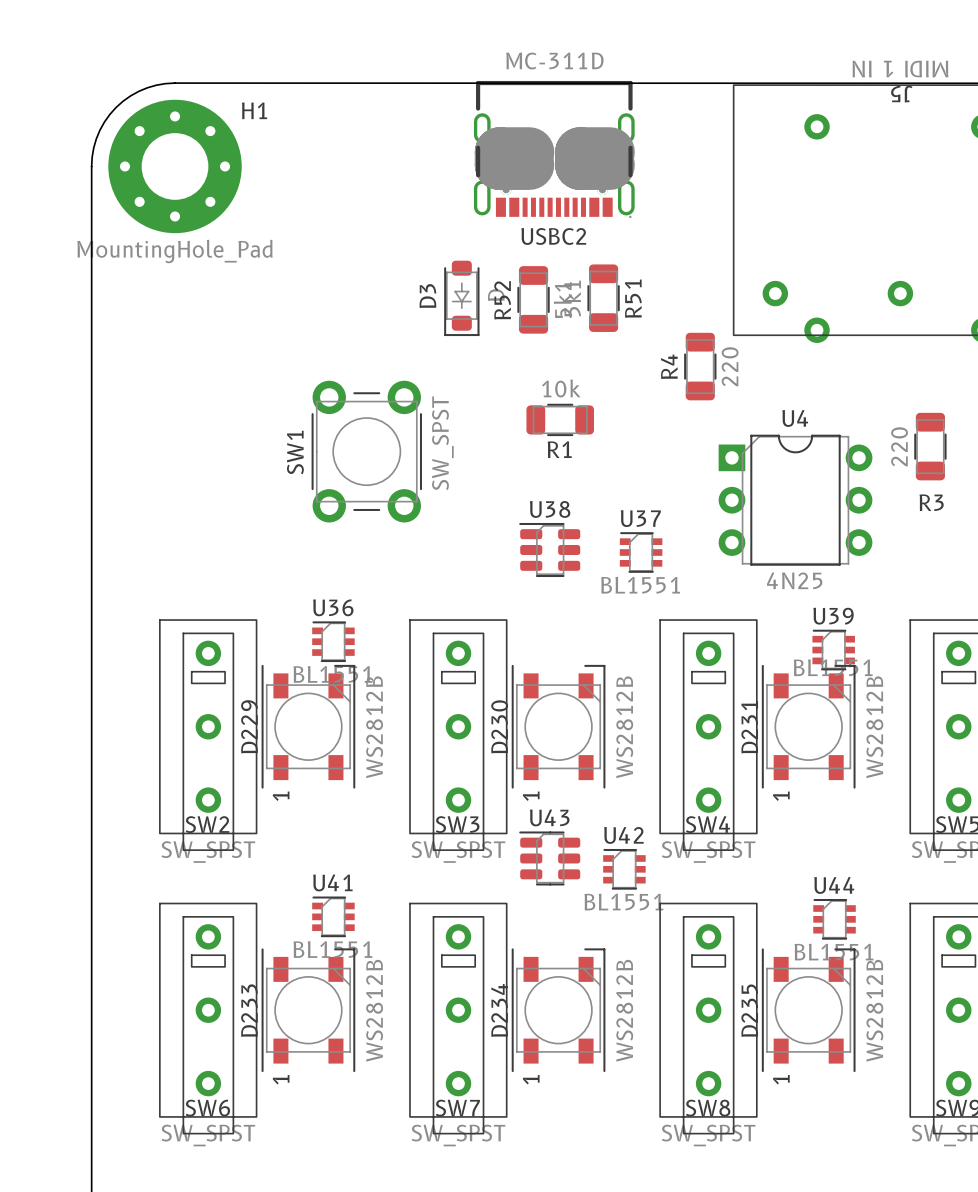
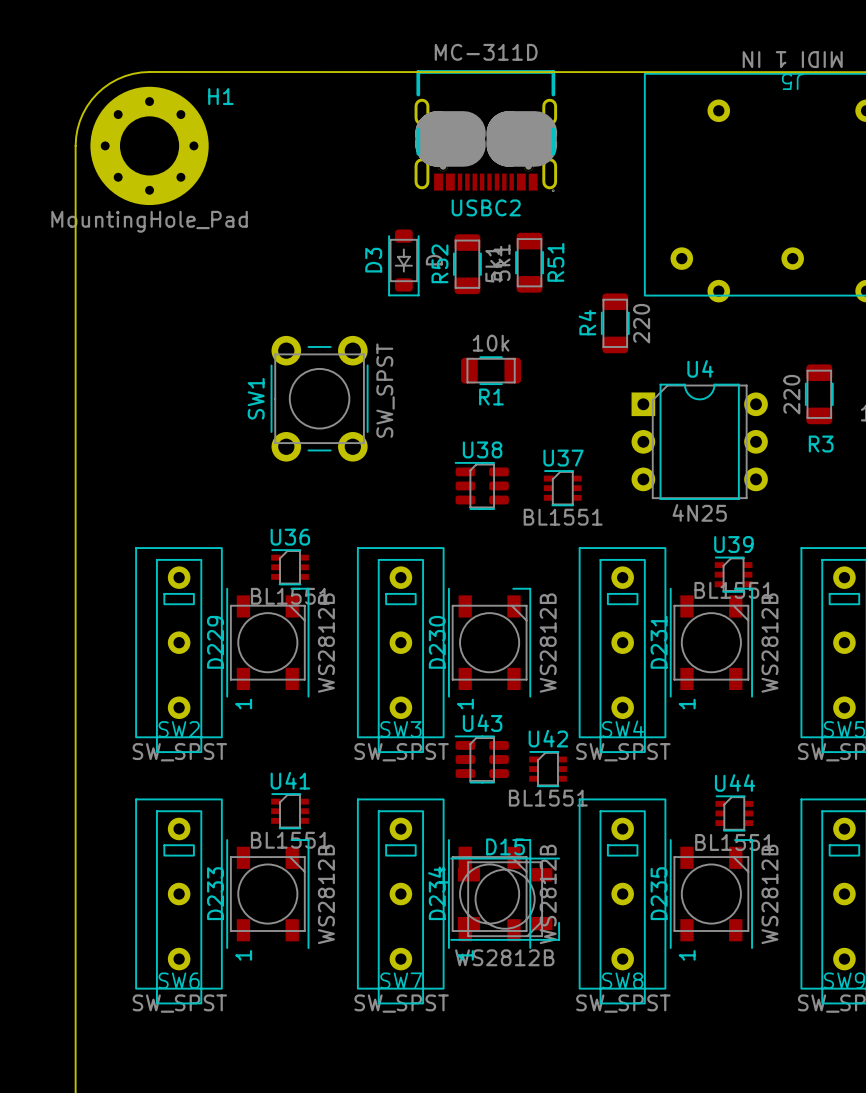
D15: none -> WS2812B (505, 899)

